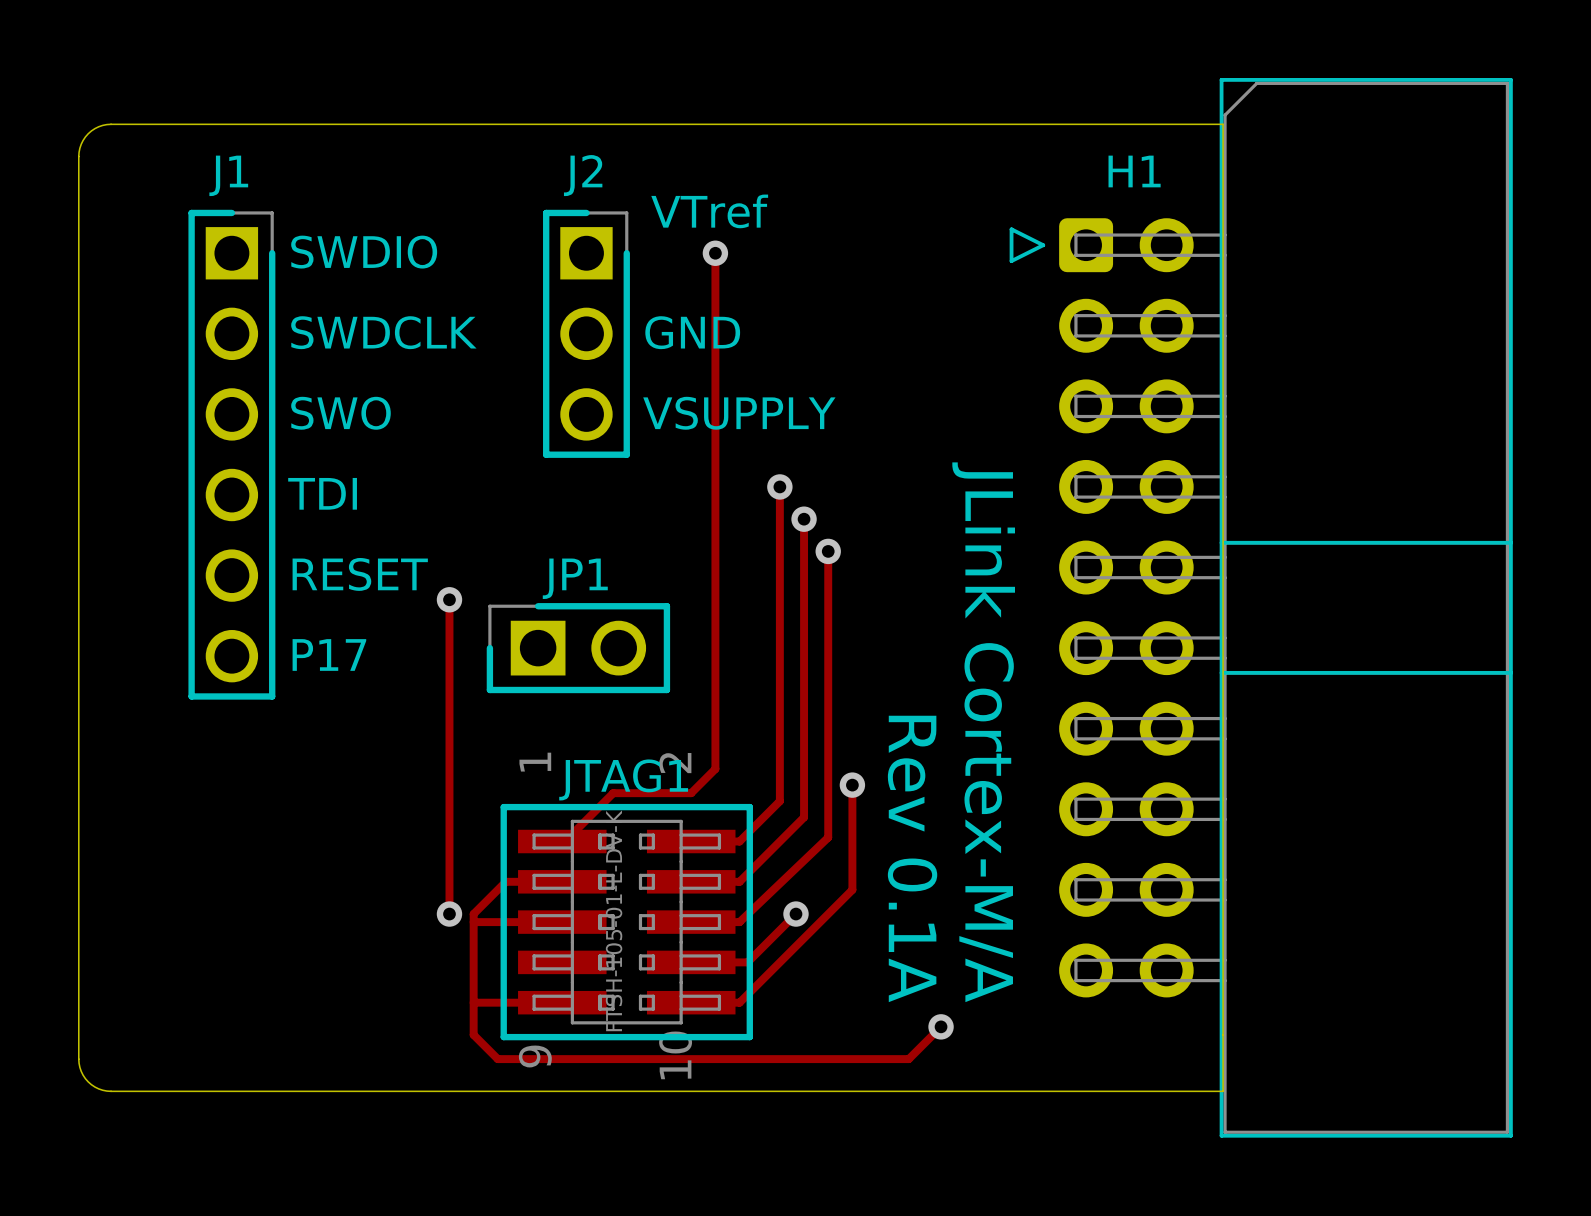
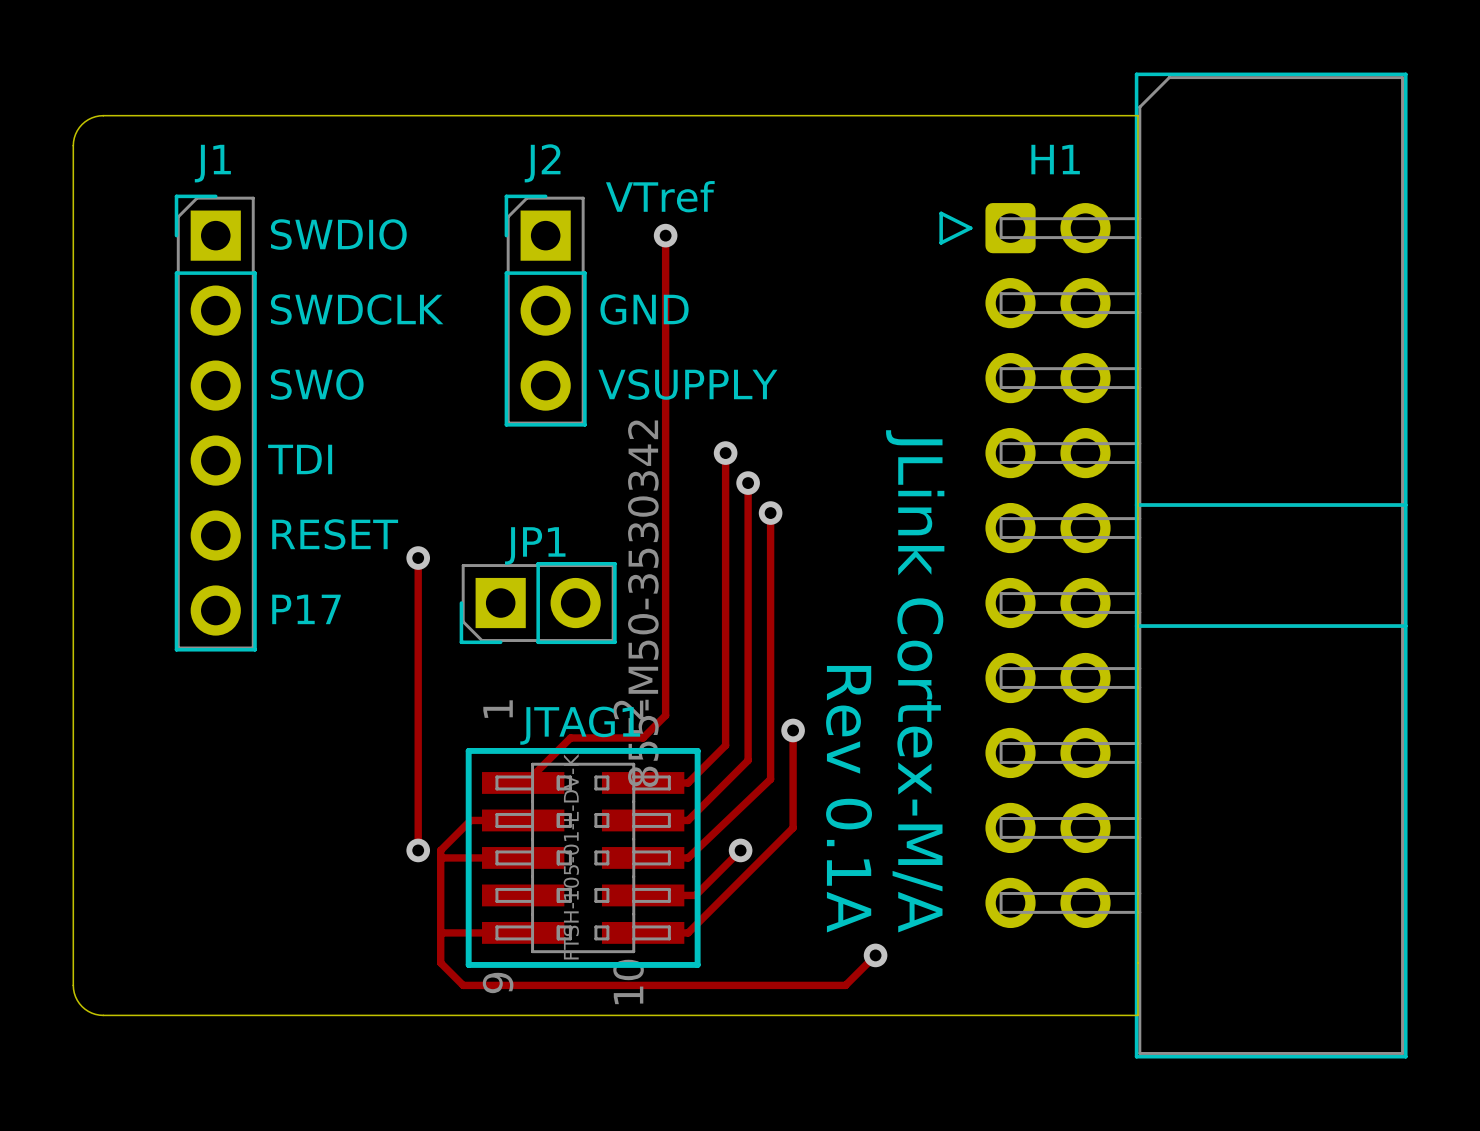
J1 footprint: [188, 209, 276, 700] -> [174, 194, 257, 652]
J2 footprint: [543, 209, 630, 458] -> [504, 194, 587, 427]
JP1 footprint: [486, 603, 671, 694] -> [459, 561, 617, 645]
JP1 value: none -> 855-M50-3530342 (643, 603)

